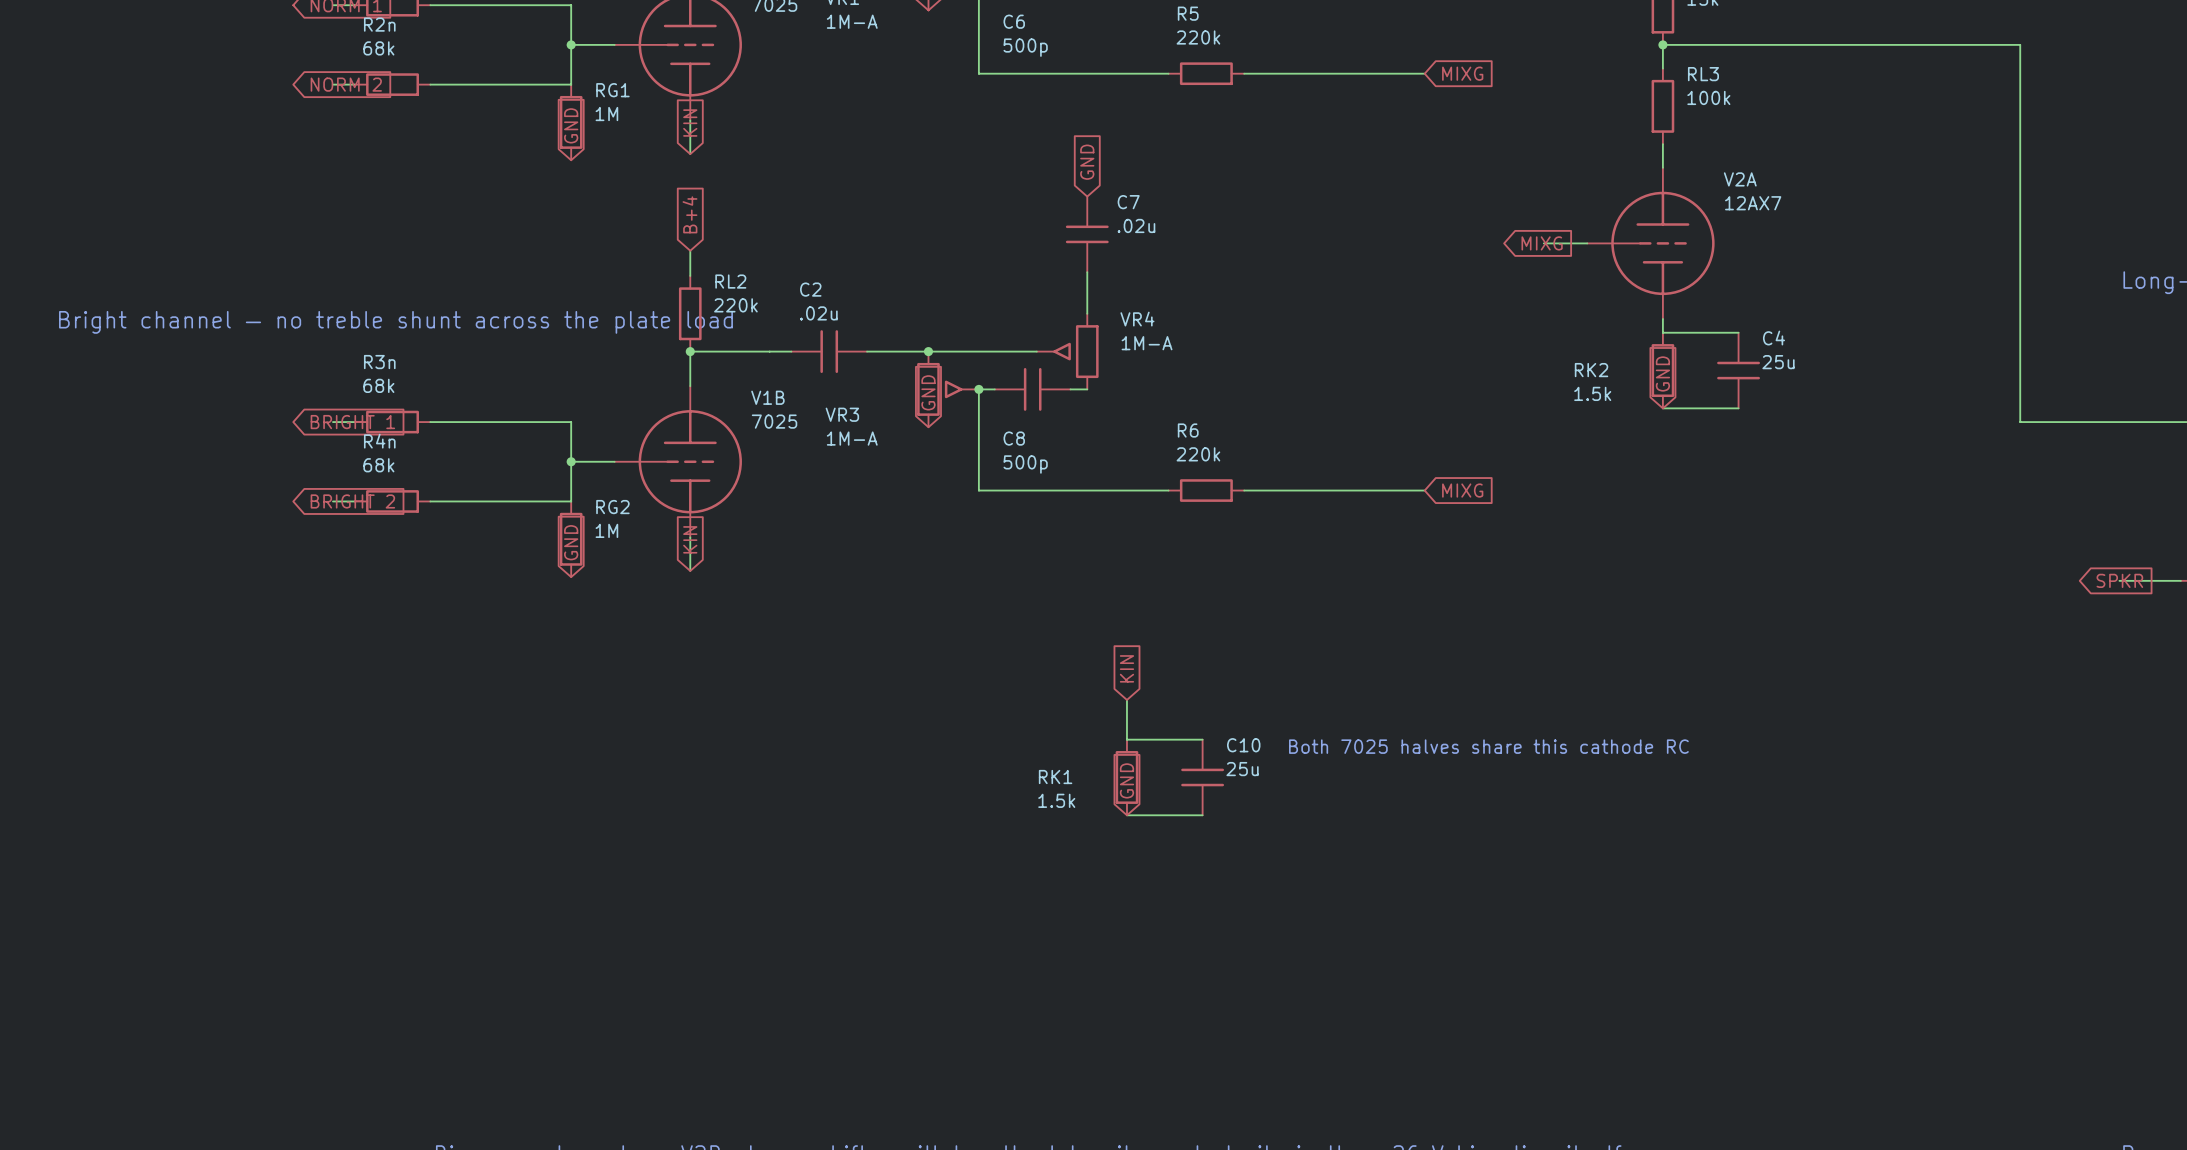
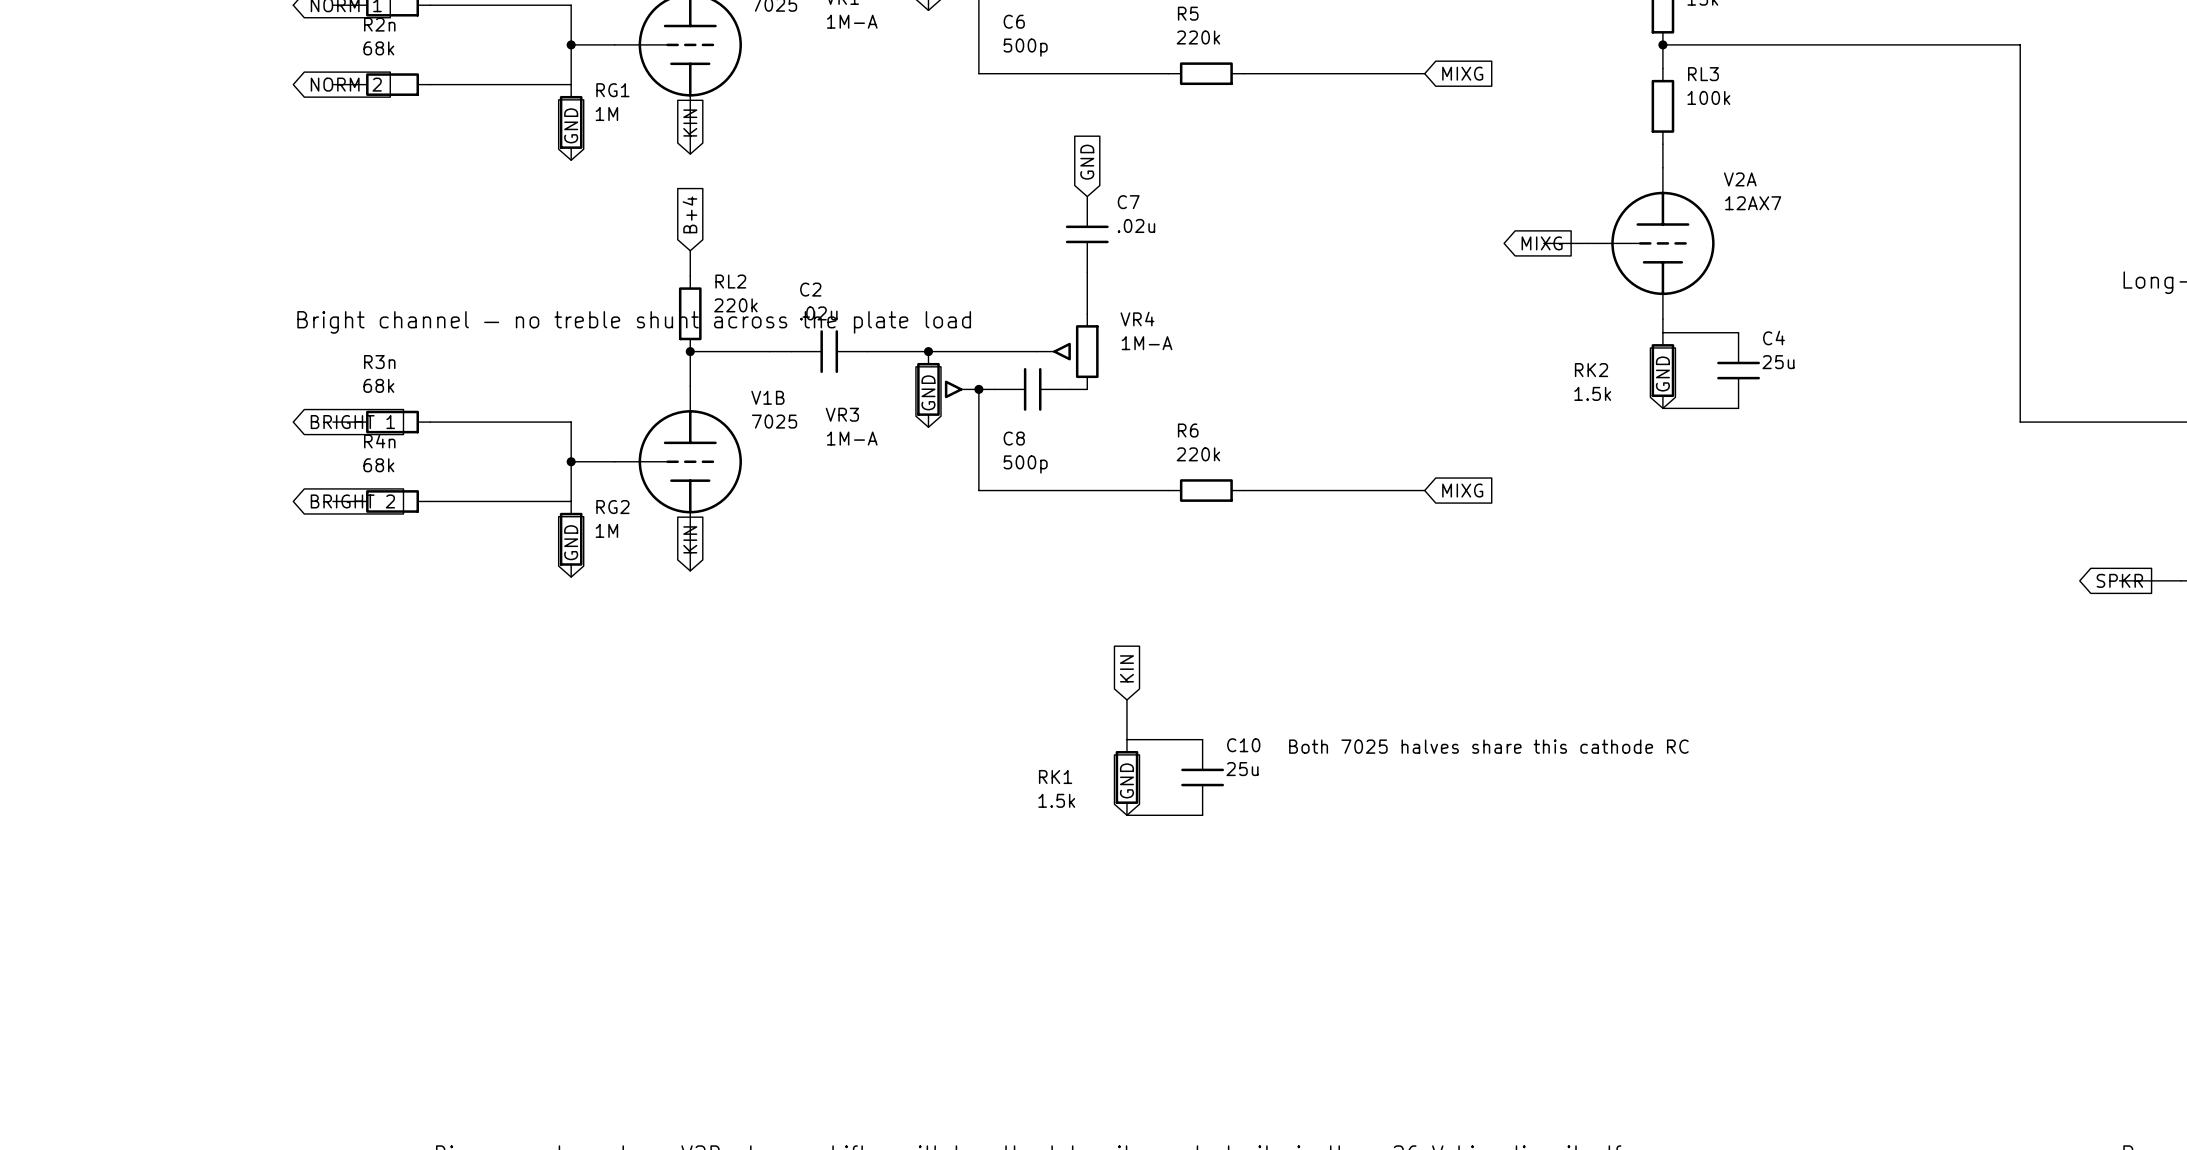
text position: Bright channel — no treble shunt across the plate load (395, 322) -> Bright channel — no treble shunt across the plate load (634, 322)

